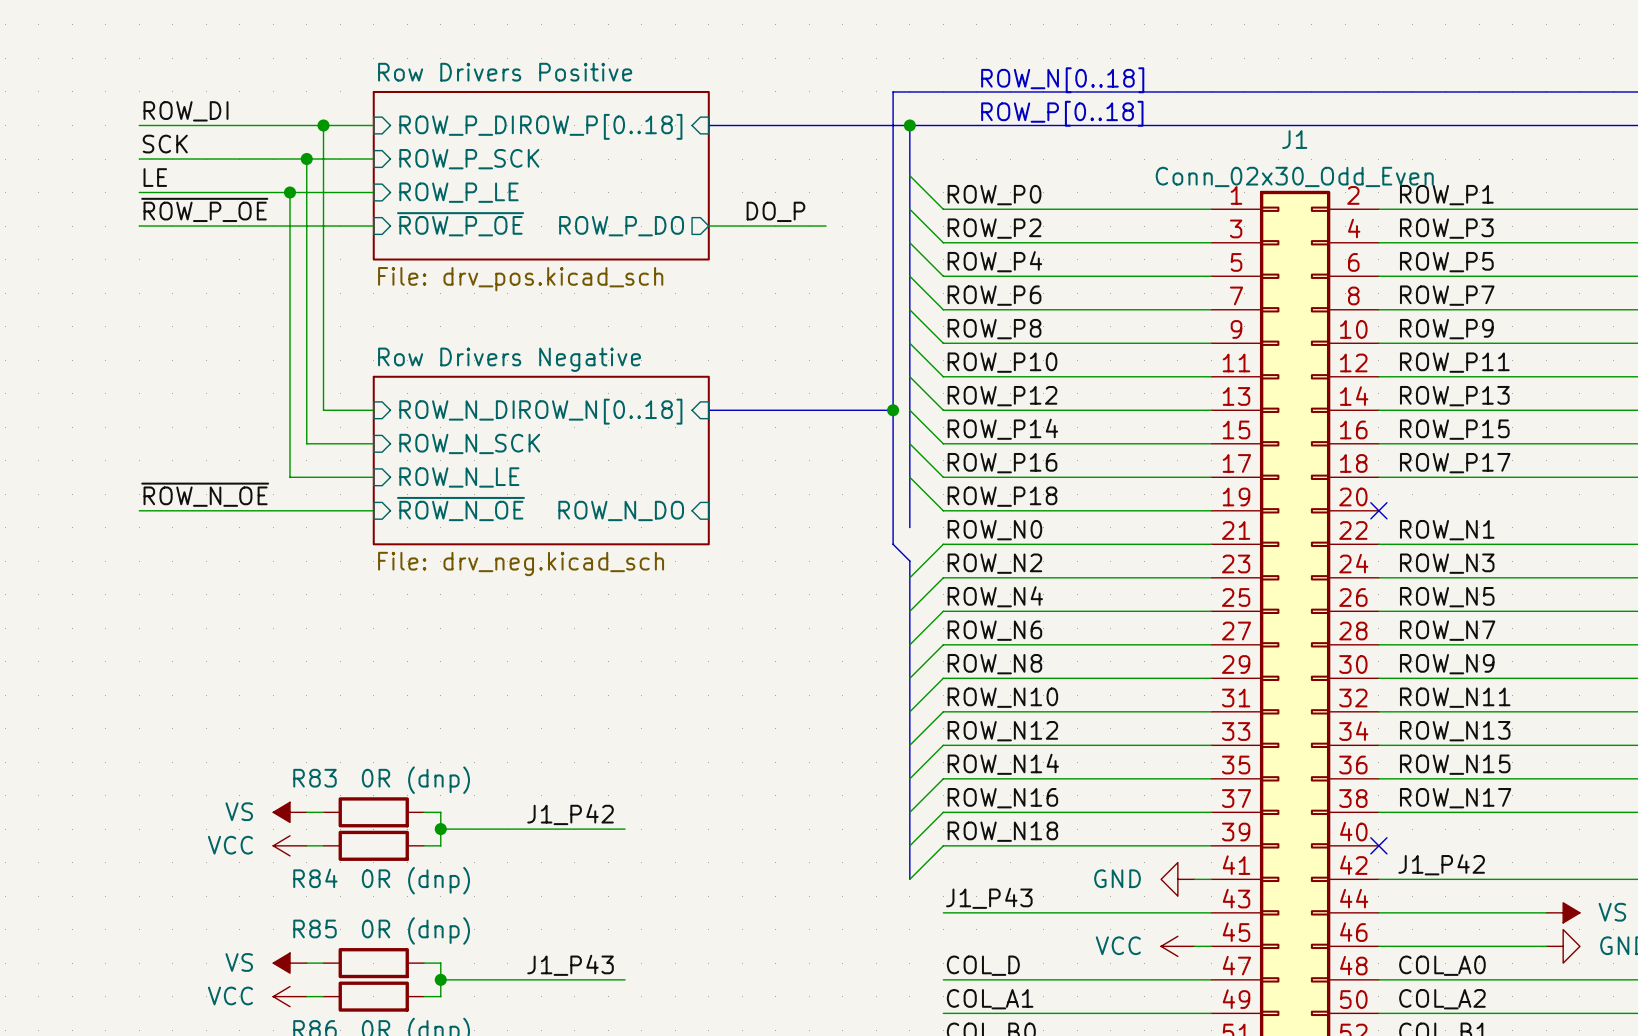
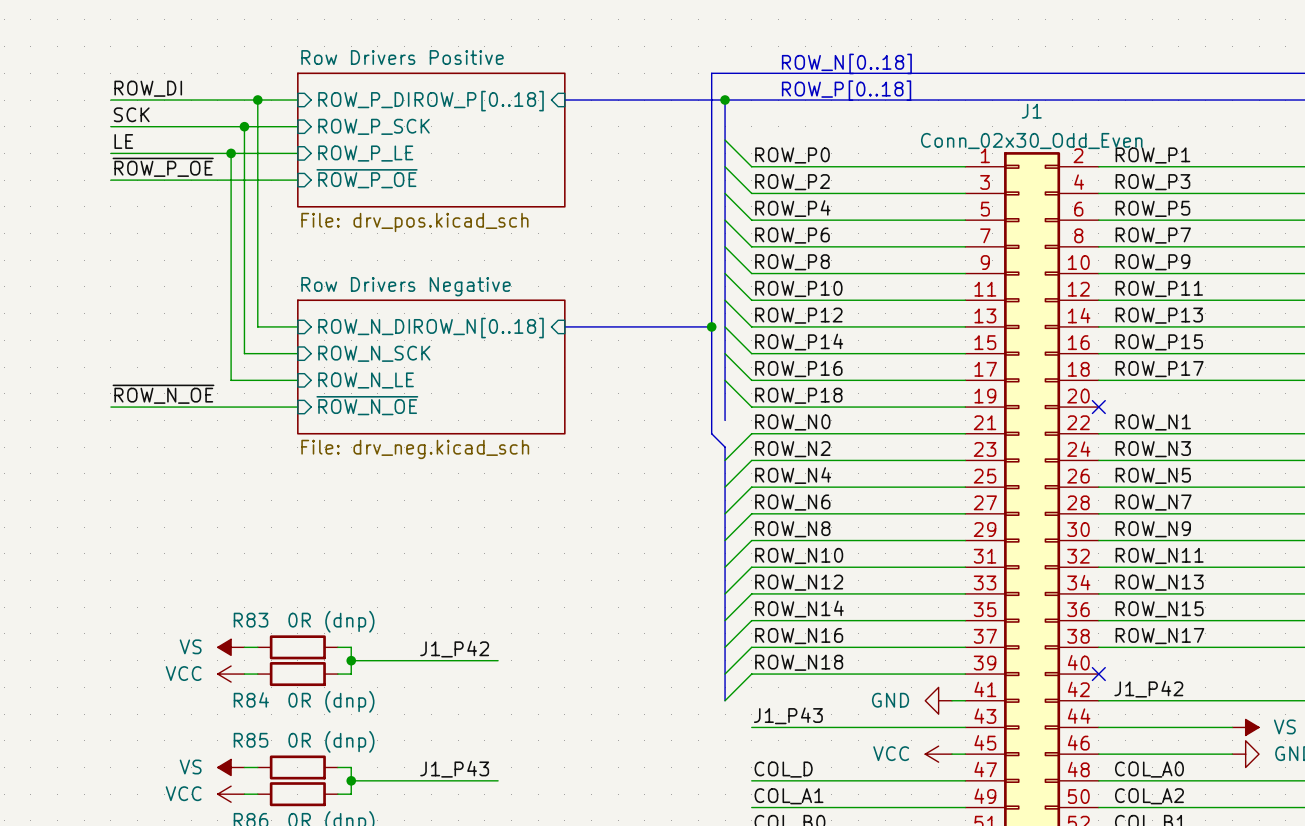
label: DO_P (775, 211) -> none
sheet pin: ROW_P_DO (621, 226) -> none
wire: (708, 226) (826, 226) -> none
sheet pin: ROW_N_DO (621, 510) -> none

